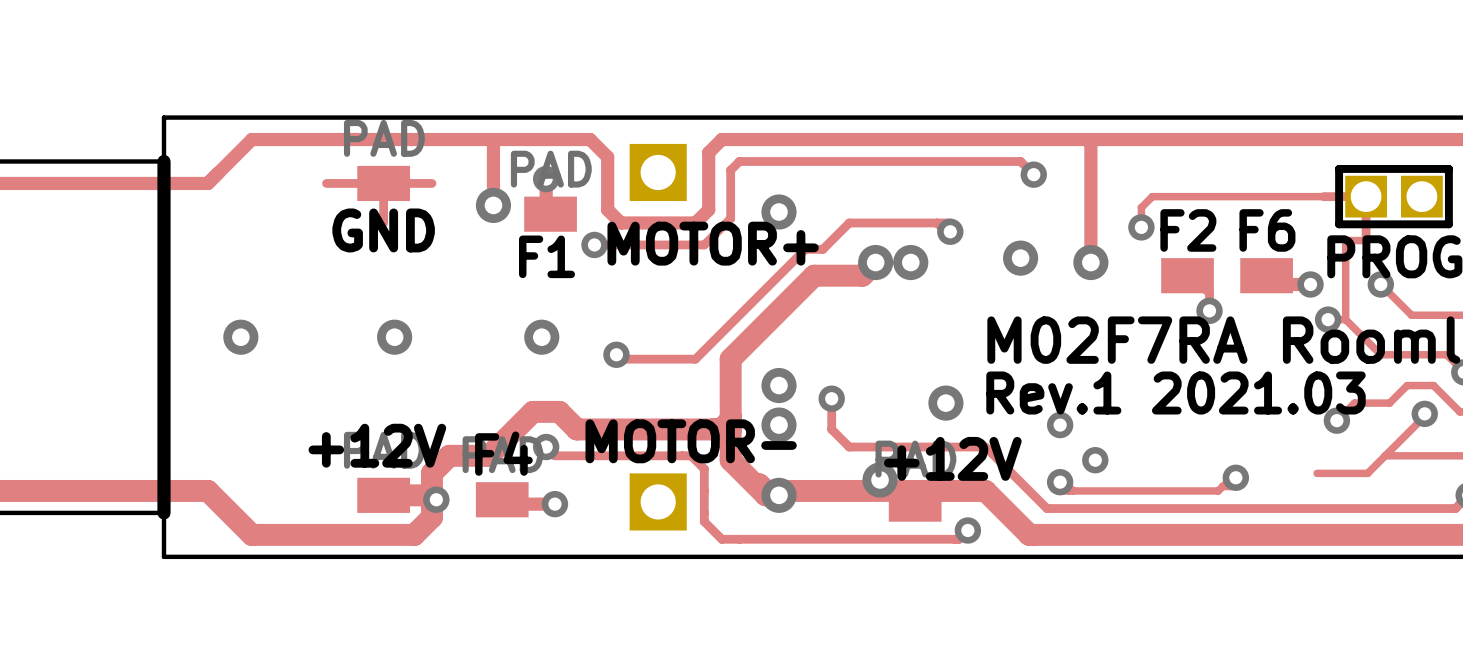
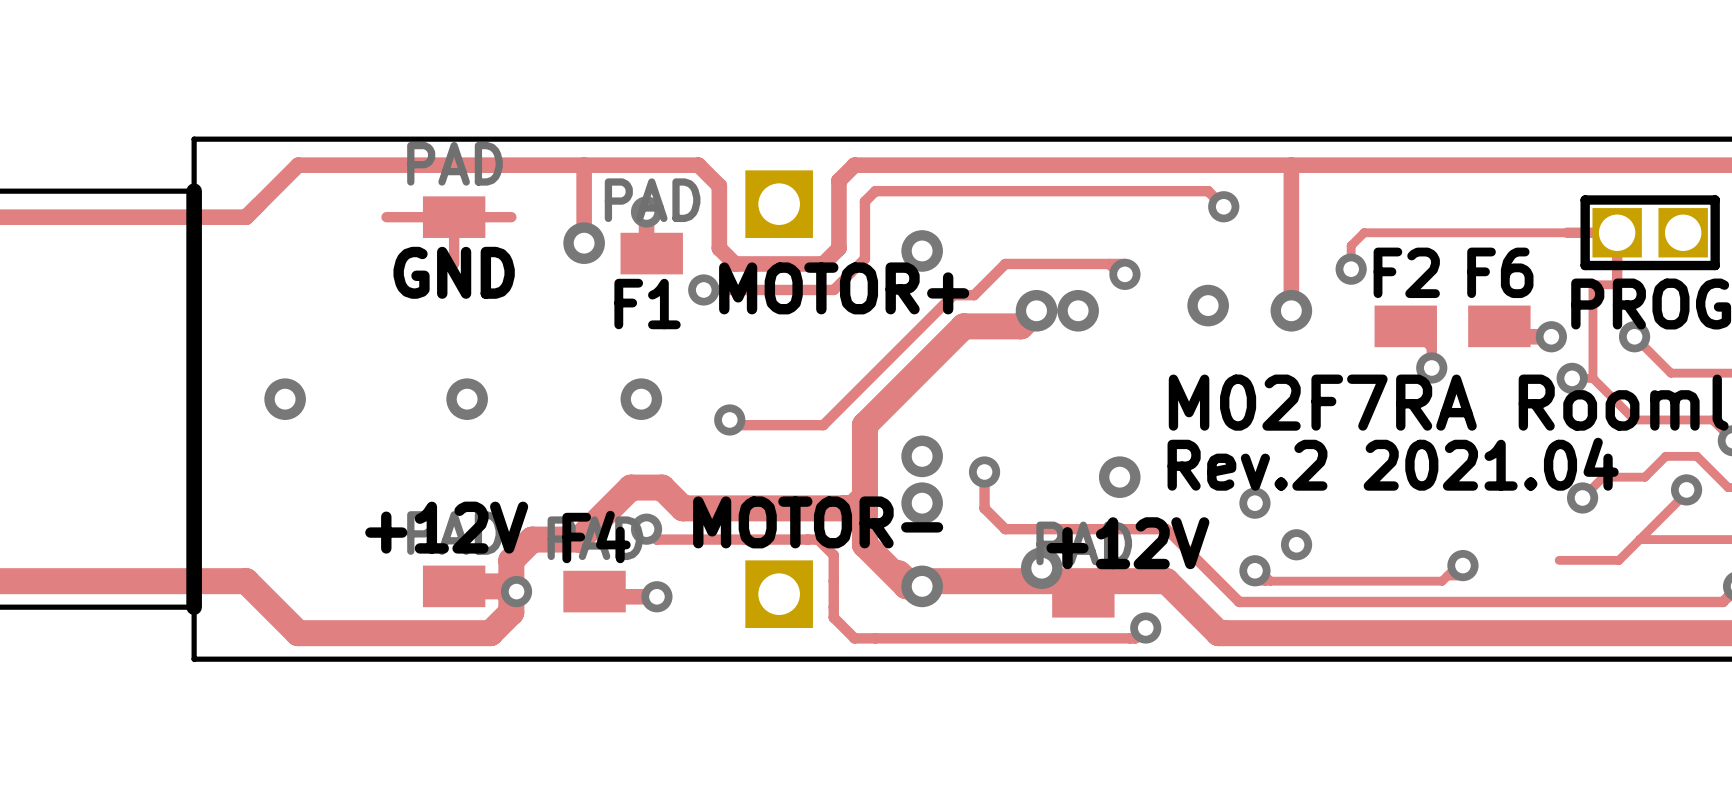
text: Rev.1 2021.03 (1176, 393) -> Rev.2 2021.04 (1393, 464)

